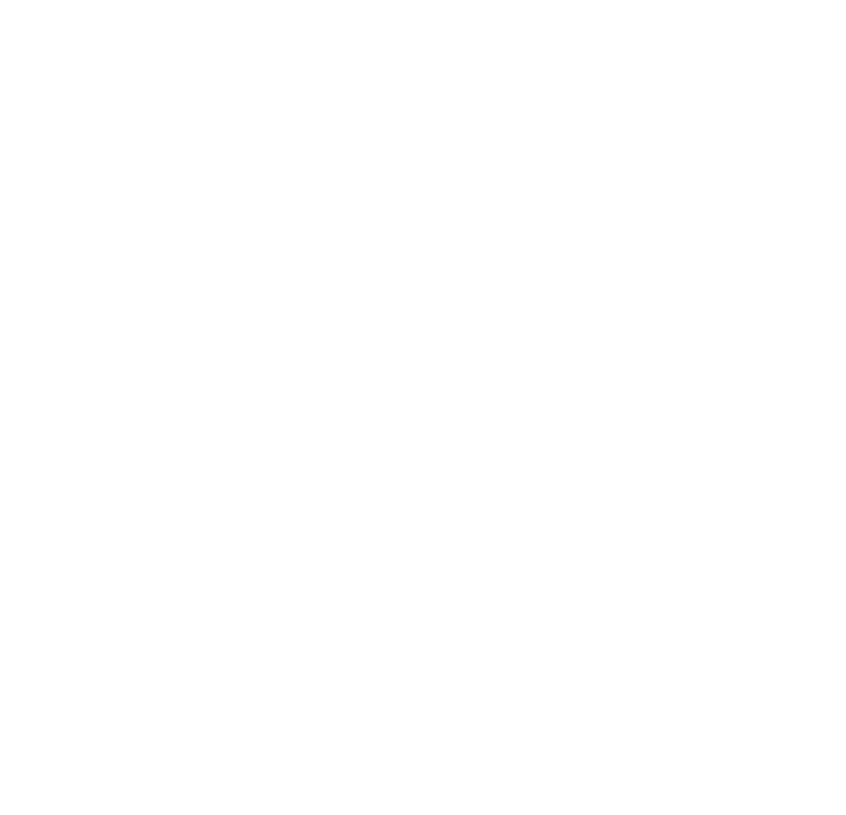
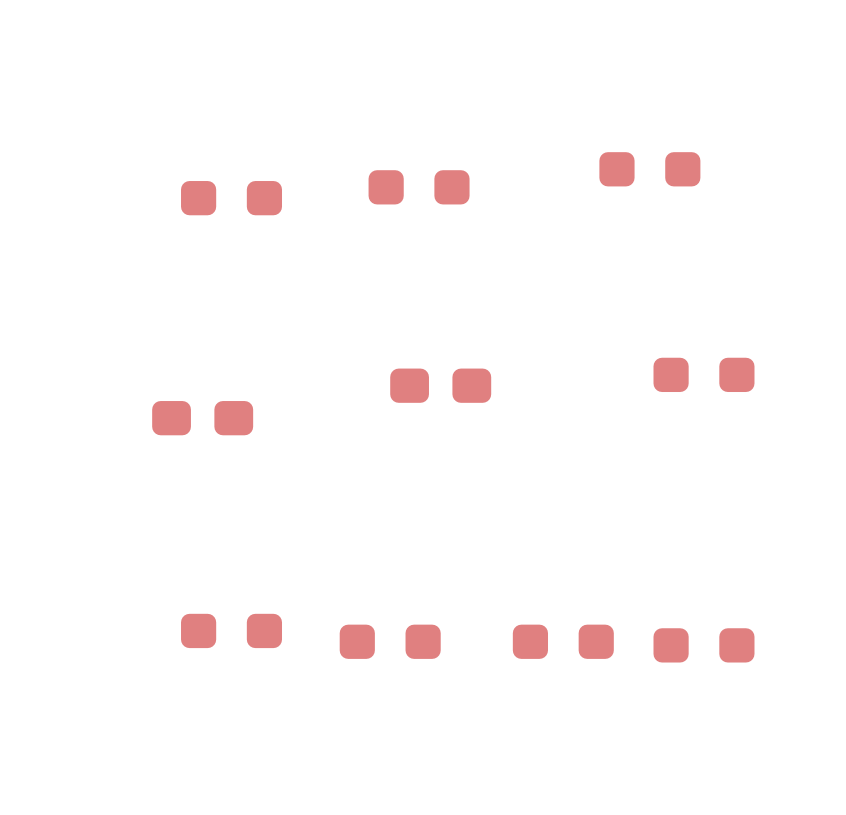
part: none -> (649, 169)
part: none -> (419, 187)
part: none -> (231, 198)
part: none -> (703, 374)
part: none -> (440, 385)
part: none -> (202, 418)
part: none -> (231, 630)
part: none -> (390, 641)
part: none -> (563, 641)
part: none -> (703, 645)

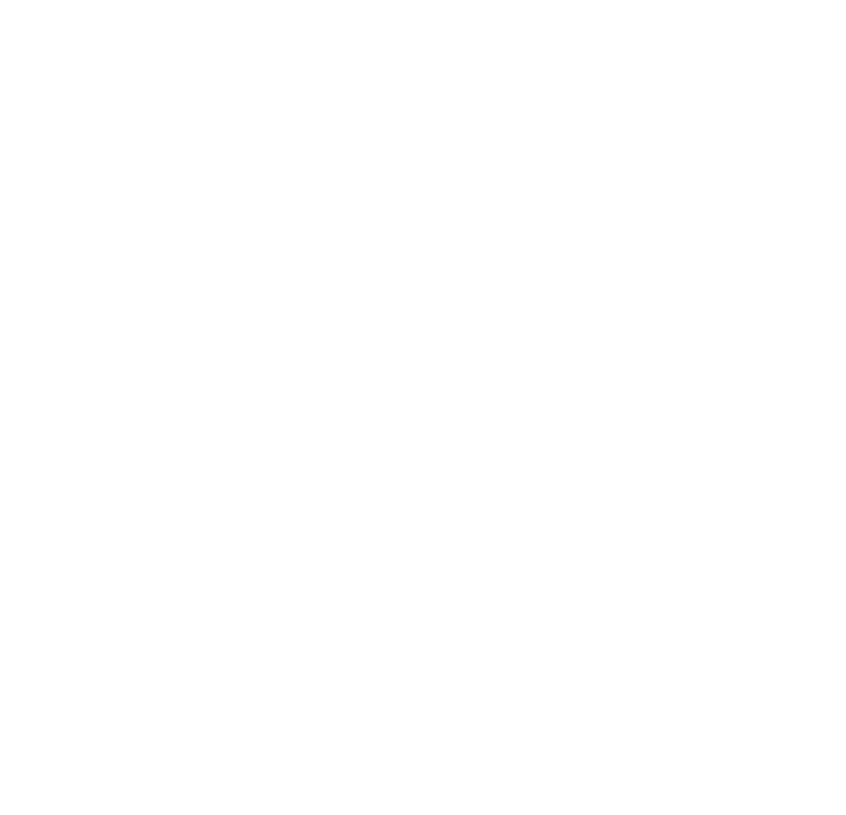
part: (649, 169) -> none
part: (419, 187) -> none
part: (231, 198) -> none
part: (703, 374) -> none
part: (440, 385) -> none
part: (202, 418) -> none
part: (231, 630) -> none
part: (390, 641) -> none
part: (563, 641) -> none
part: (703, 645) -> none

